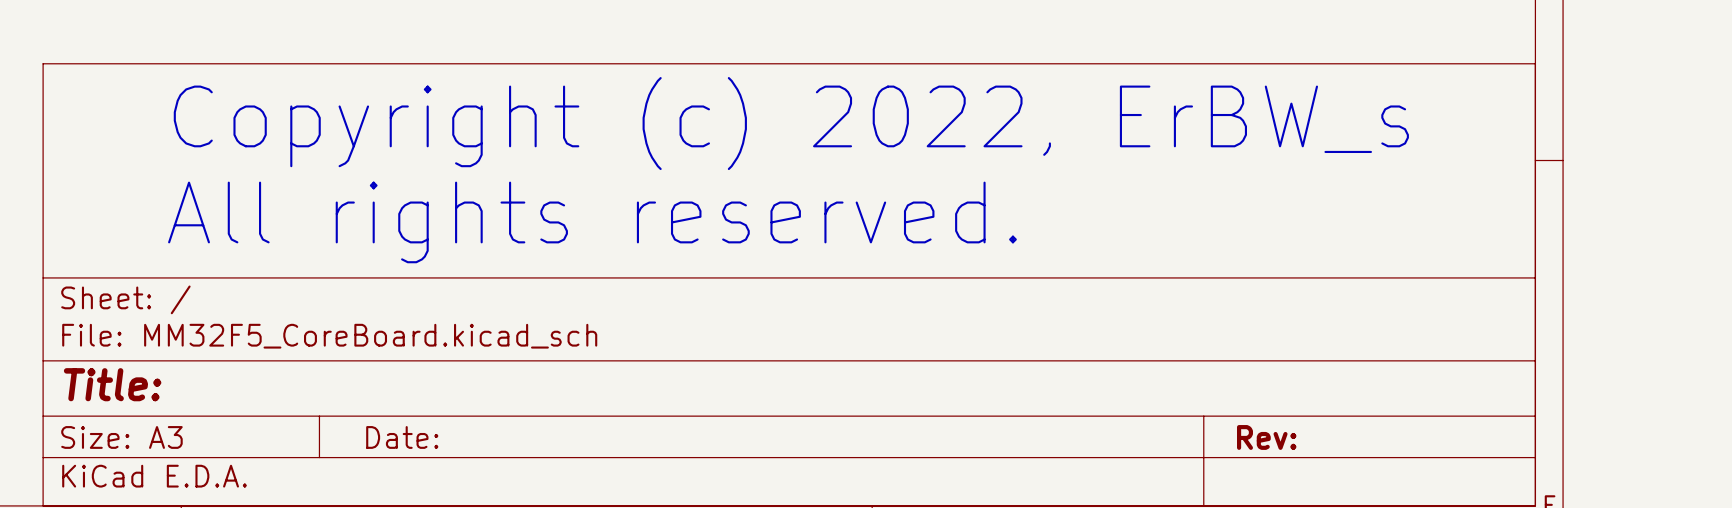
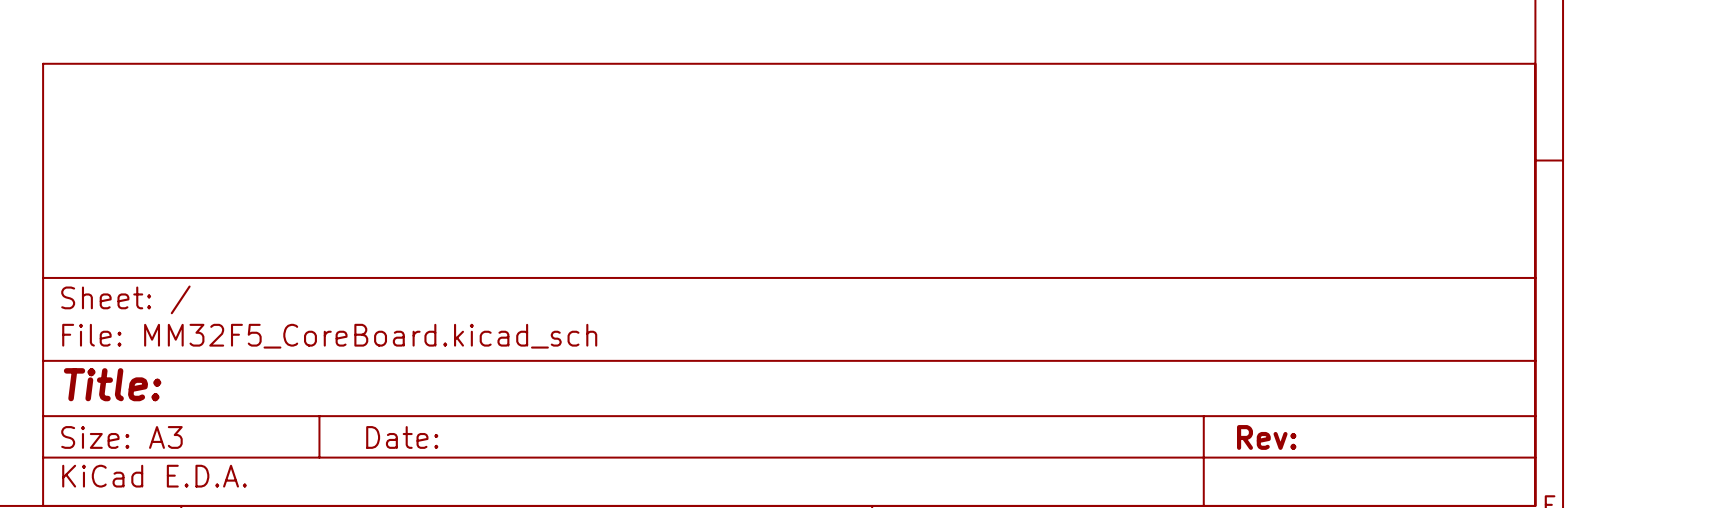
text: Copyright (c) 2022, ErBW_s (791, 123) -> none
text: All rights reserved. (592, 222) -> none

